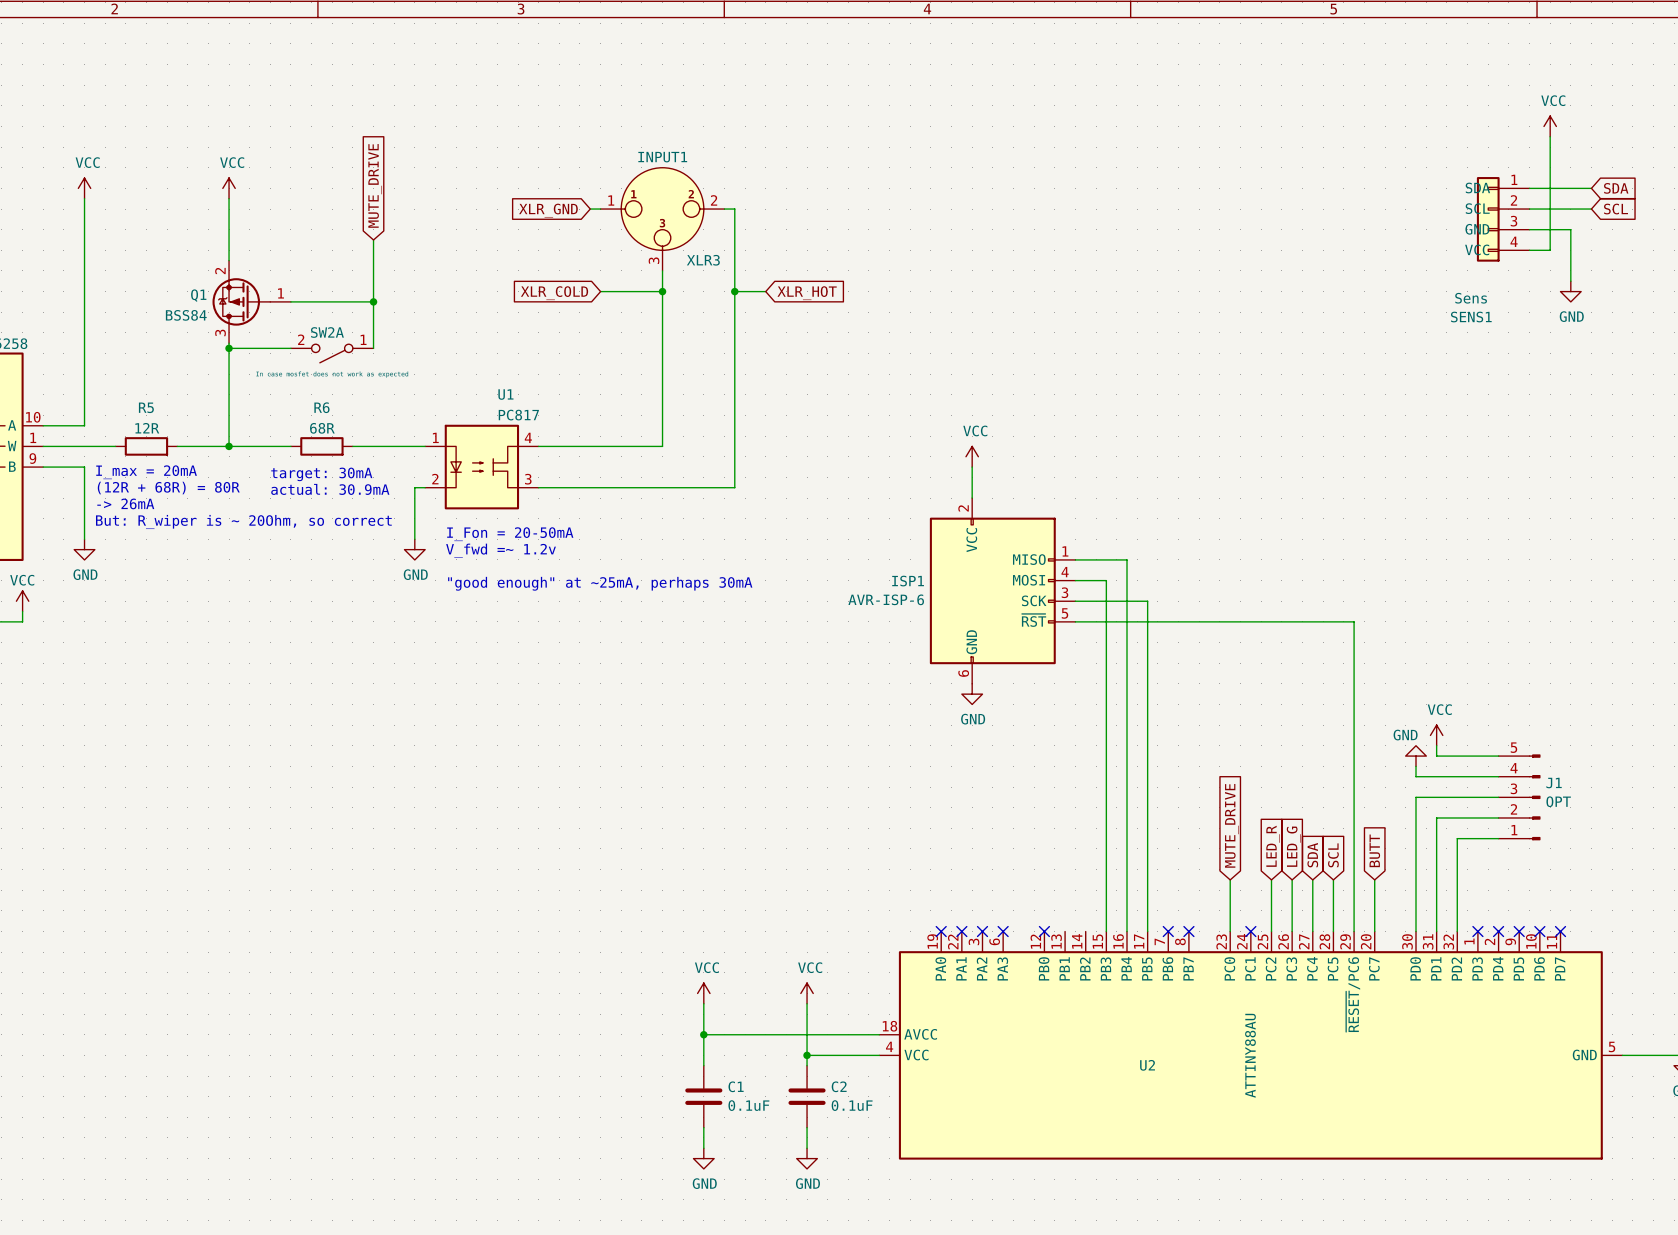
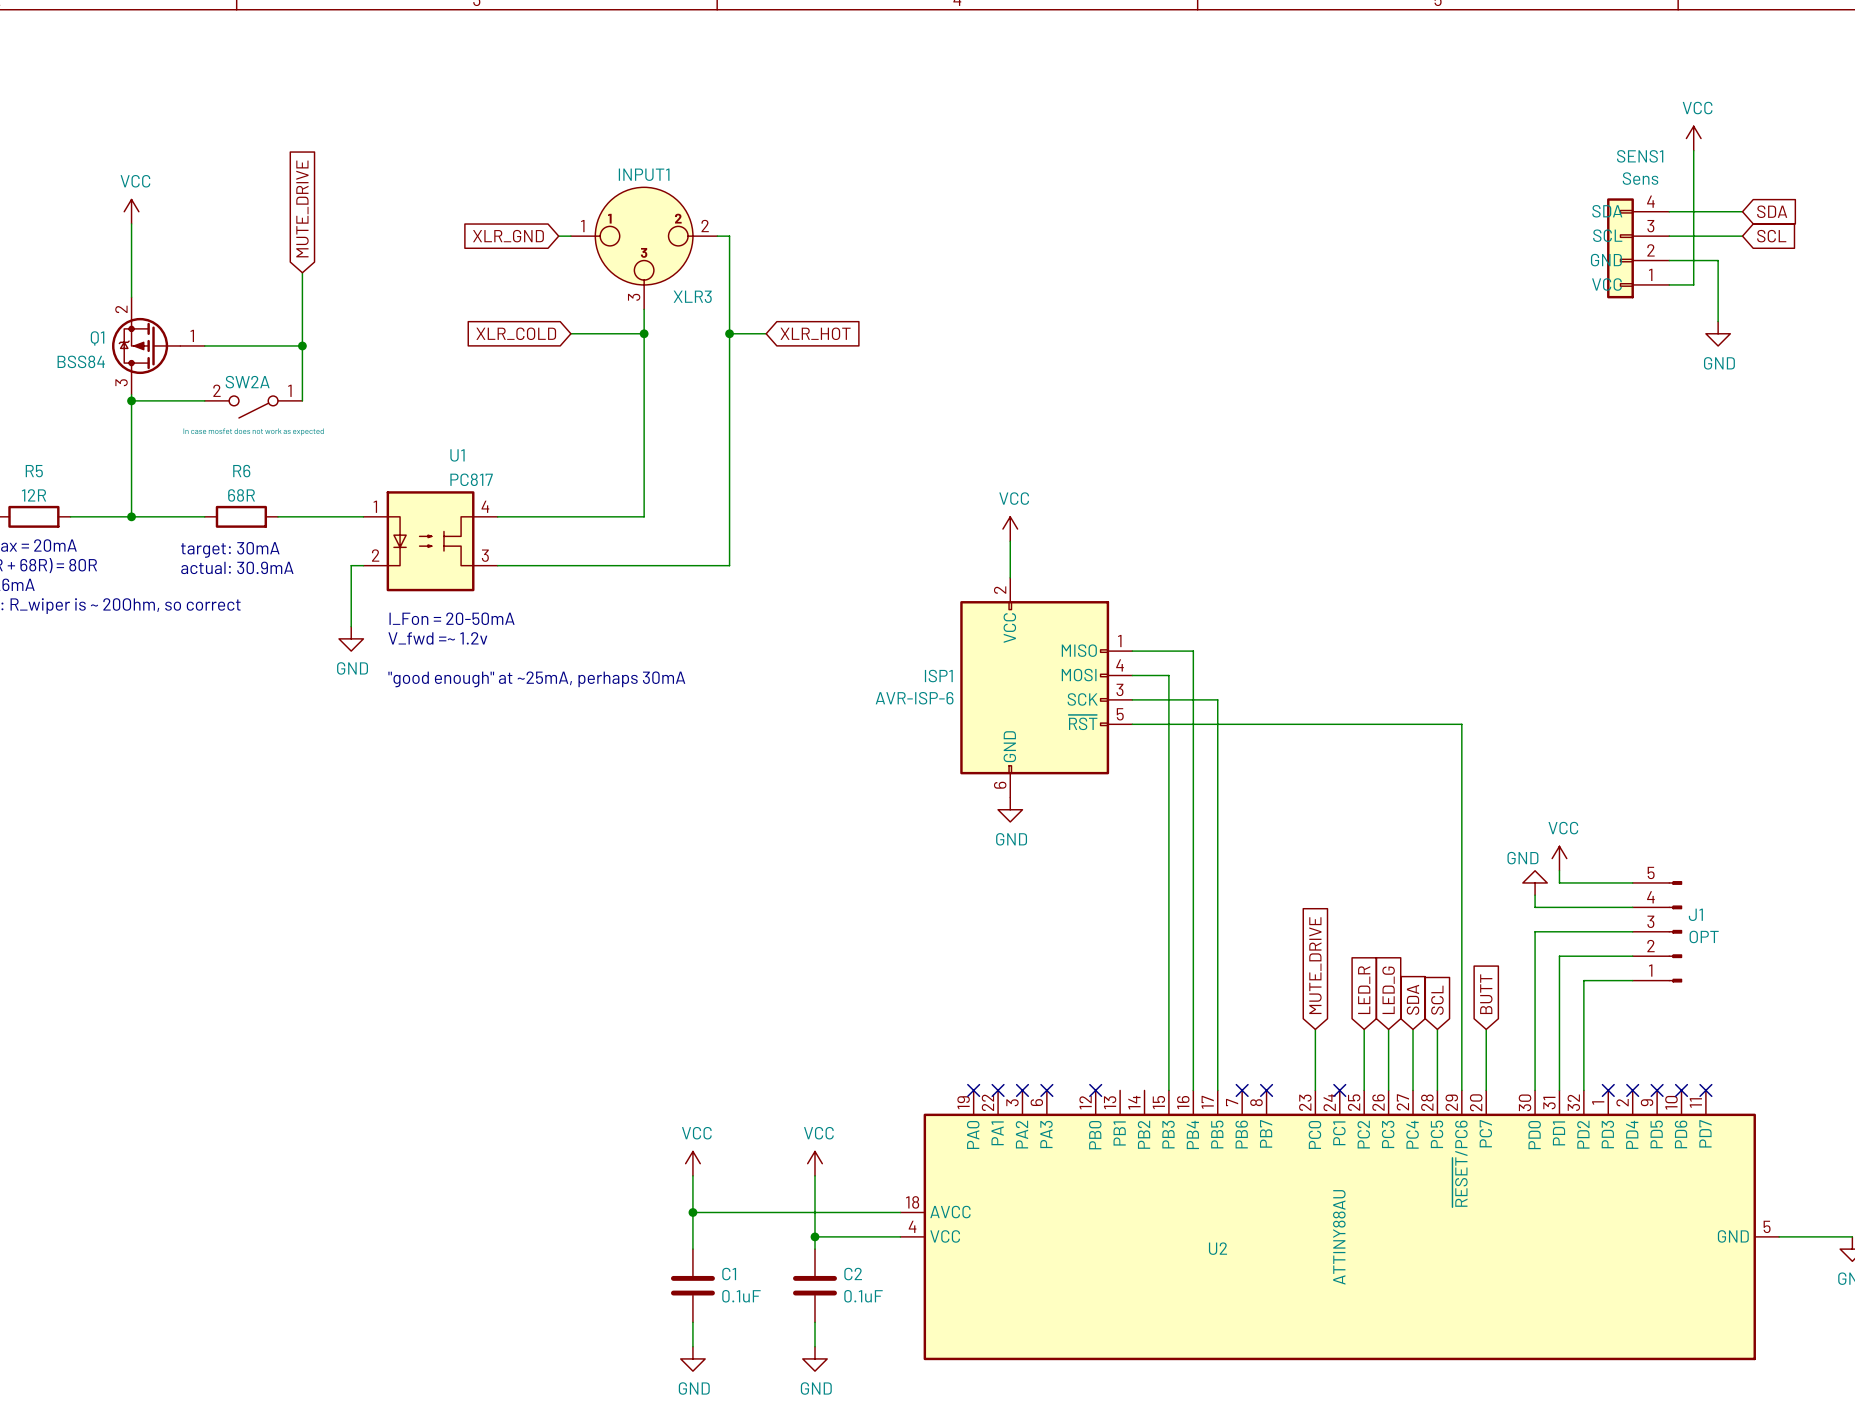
SENS1 pin number: 1 (1514, 179) -> 4 (1650, 201)
SENS1 pin number: 2 (1513, 200) -> 3 (1650, 226)
SENS1 pin number: 3 (1513, 221) -> 2 (1650, 250)
SENS1 pin number: 4 (1514, 241) -> 1 (1650, 274)
SENS1 value position: Sens (1471, 298) -> Sens (1640, 178)
SENS1 name position: SENS1 (1471, 317) -> SENS1 (1640, 156)

